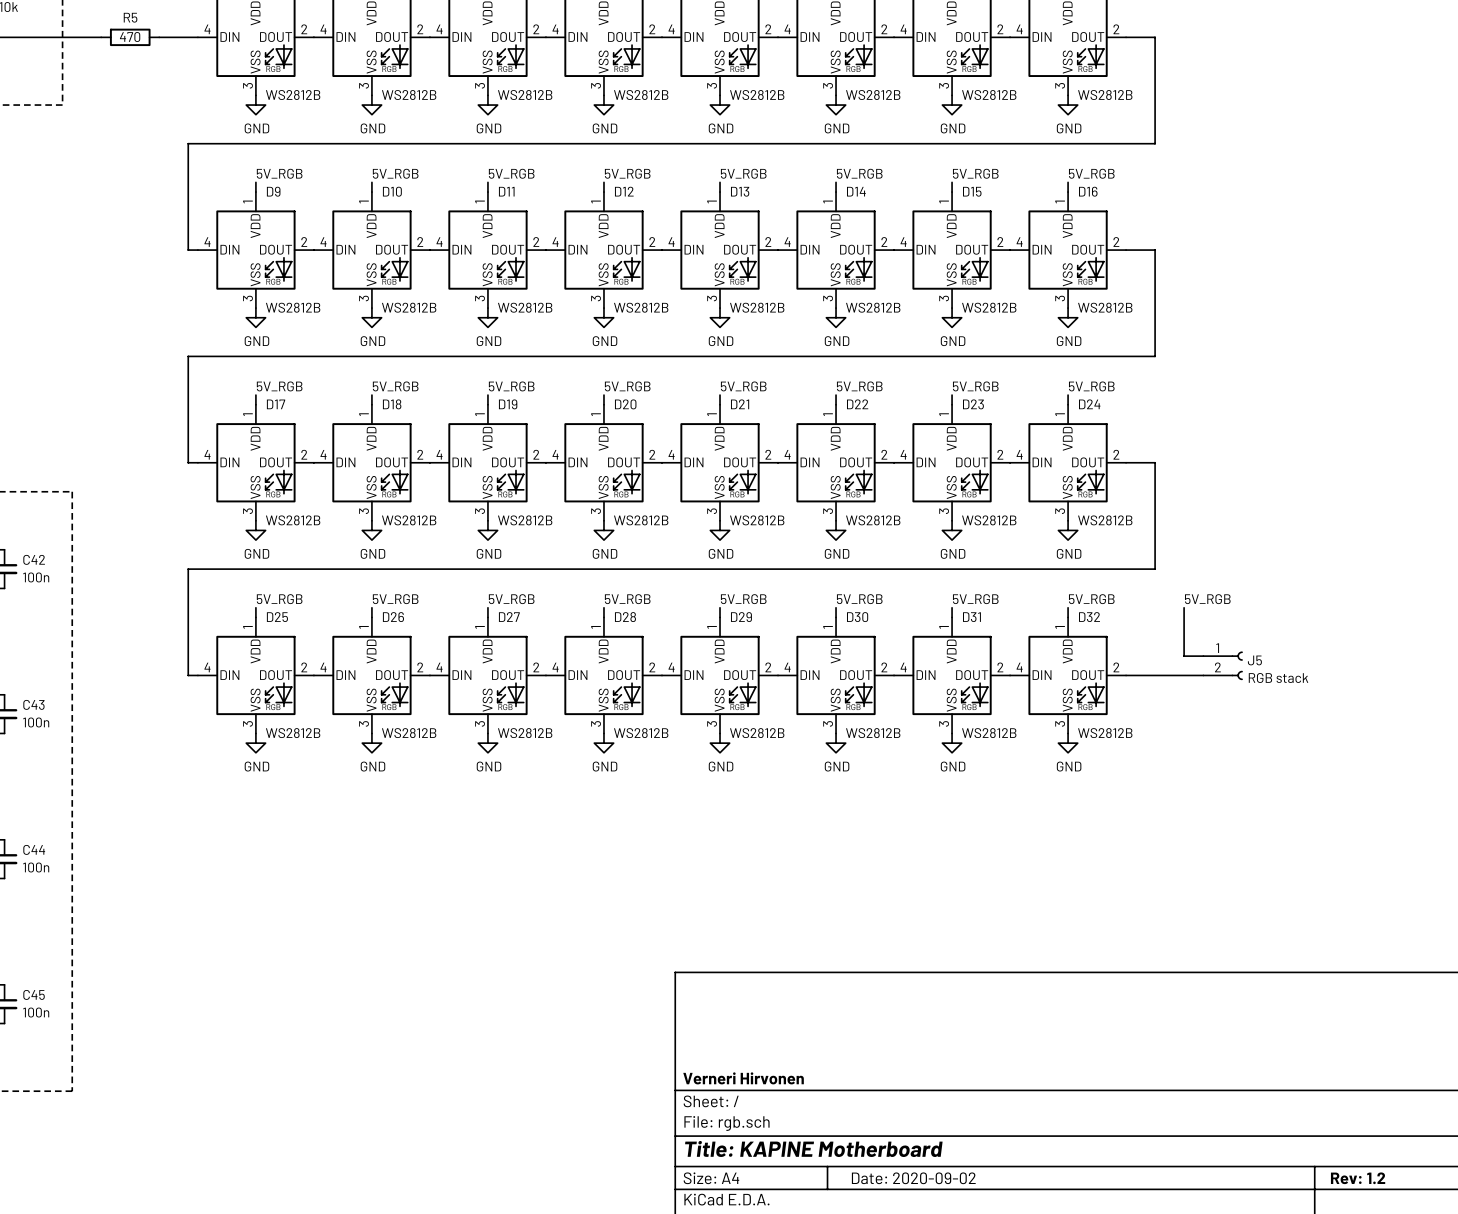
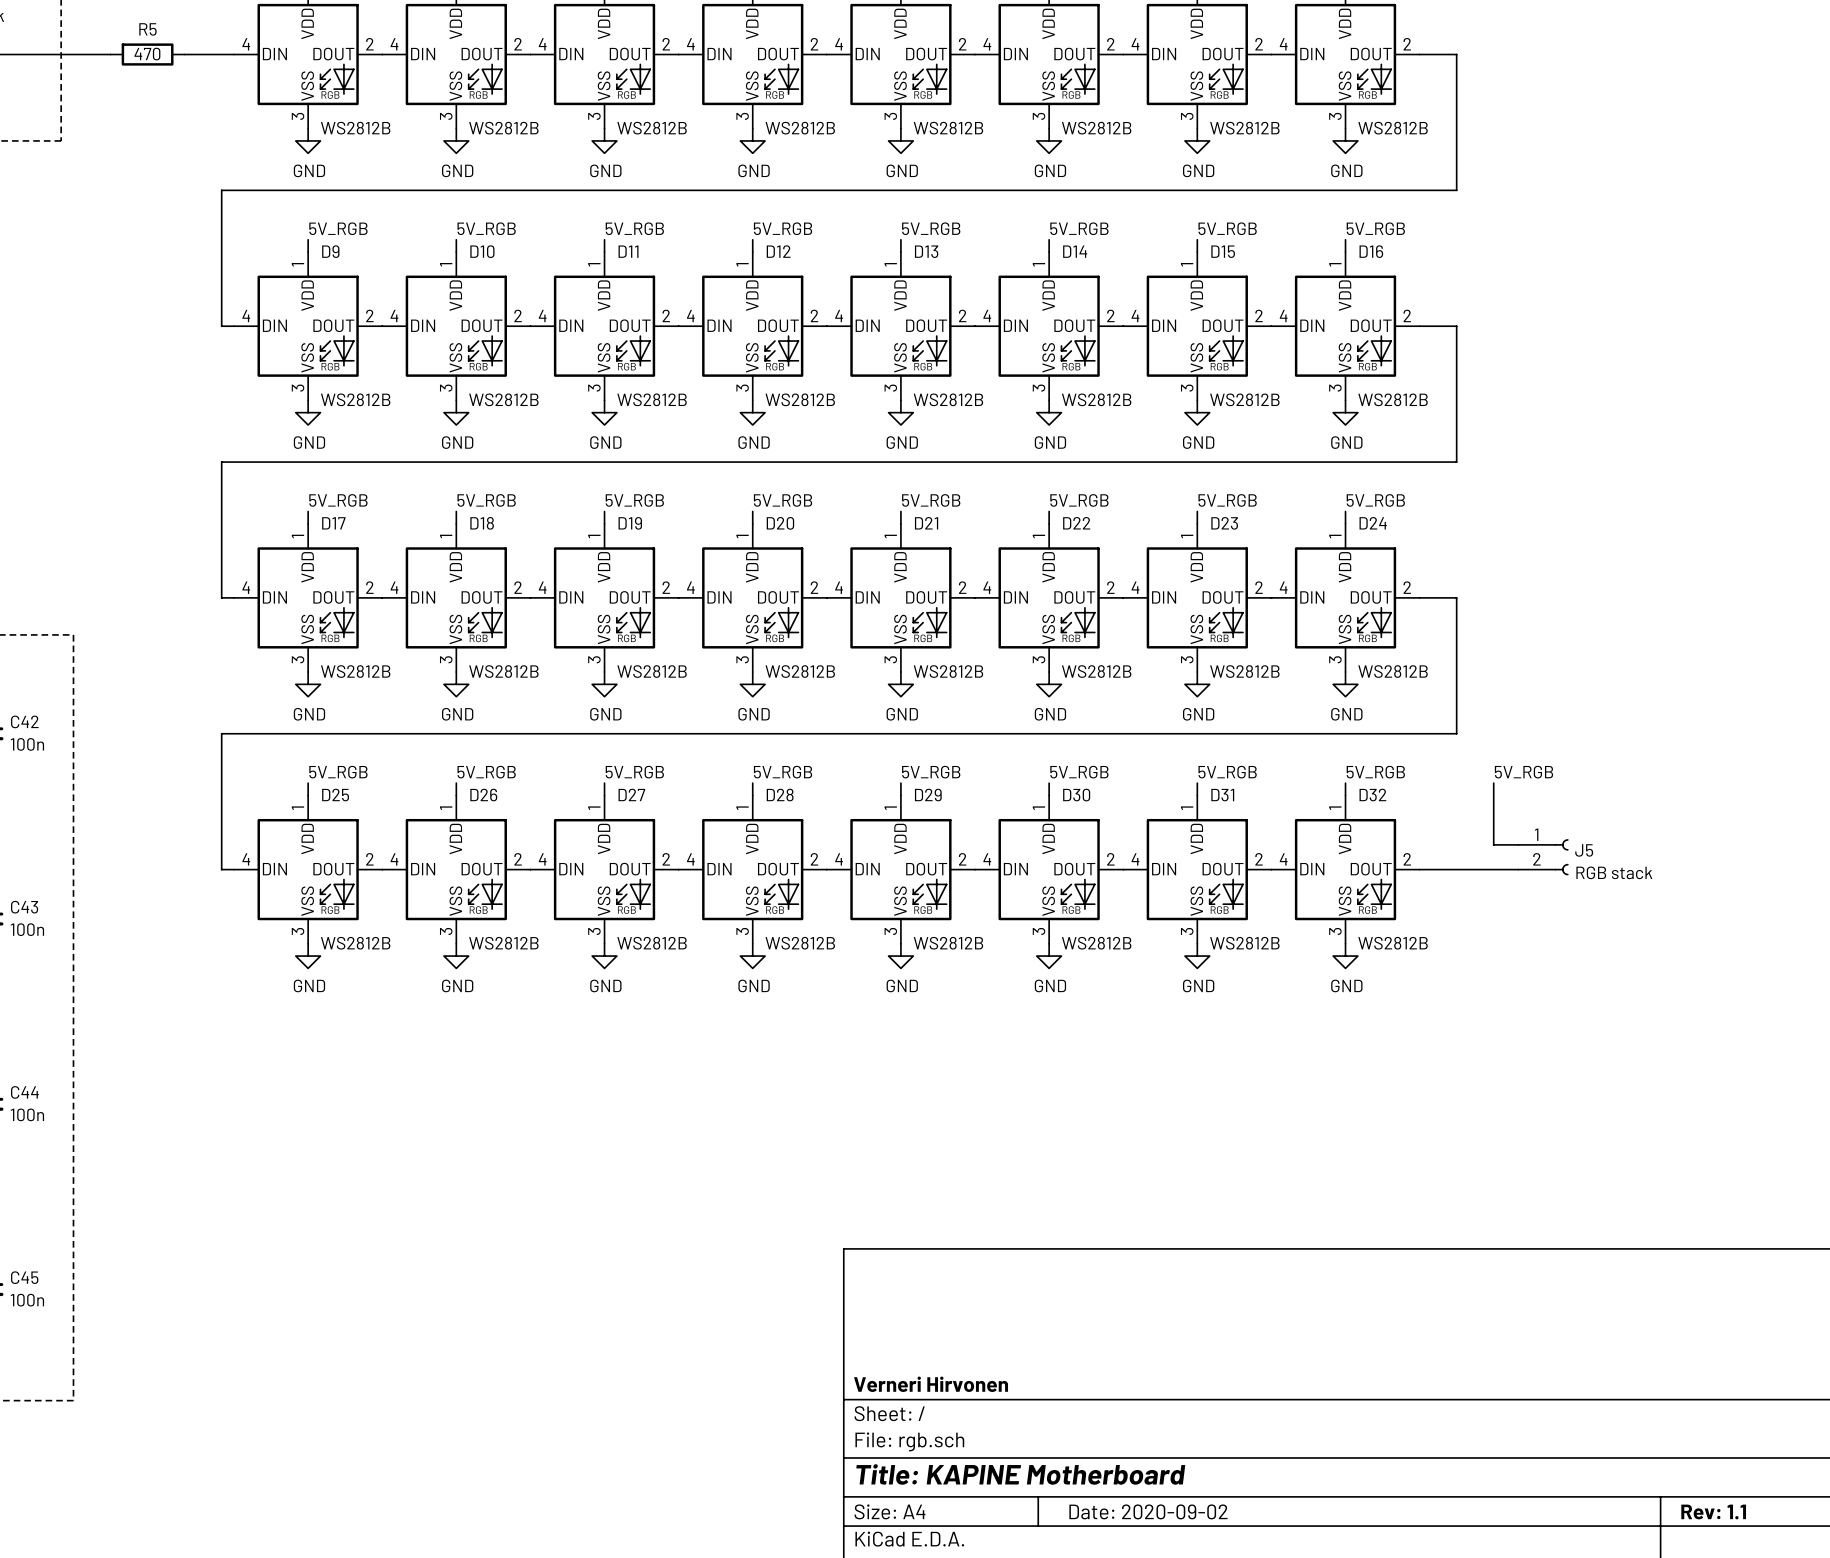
title block: Rev: 1.2 (1358, 1178) -> Rev: 1.1 (1713, 1511)

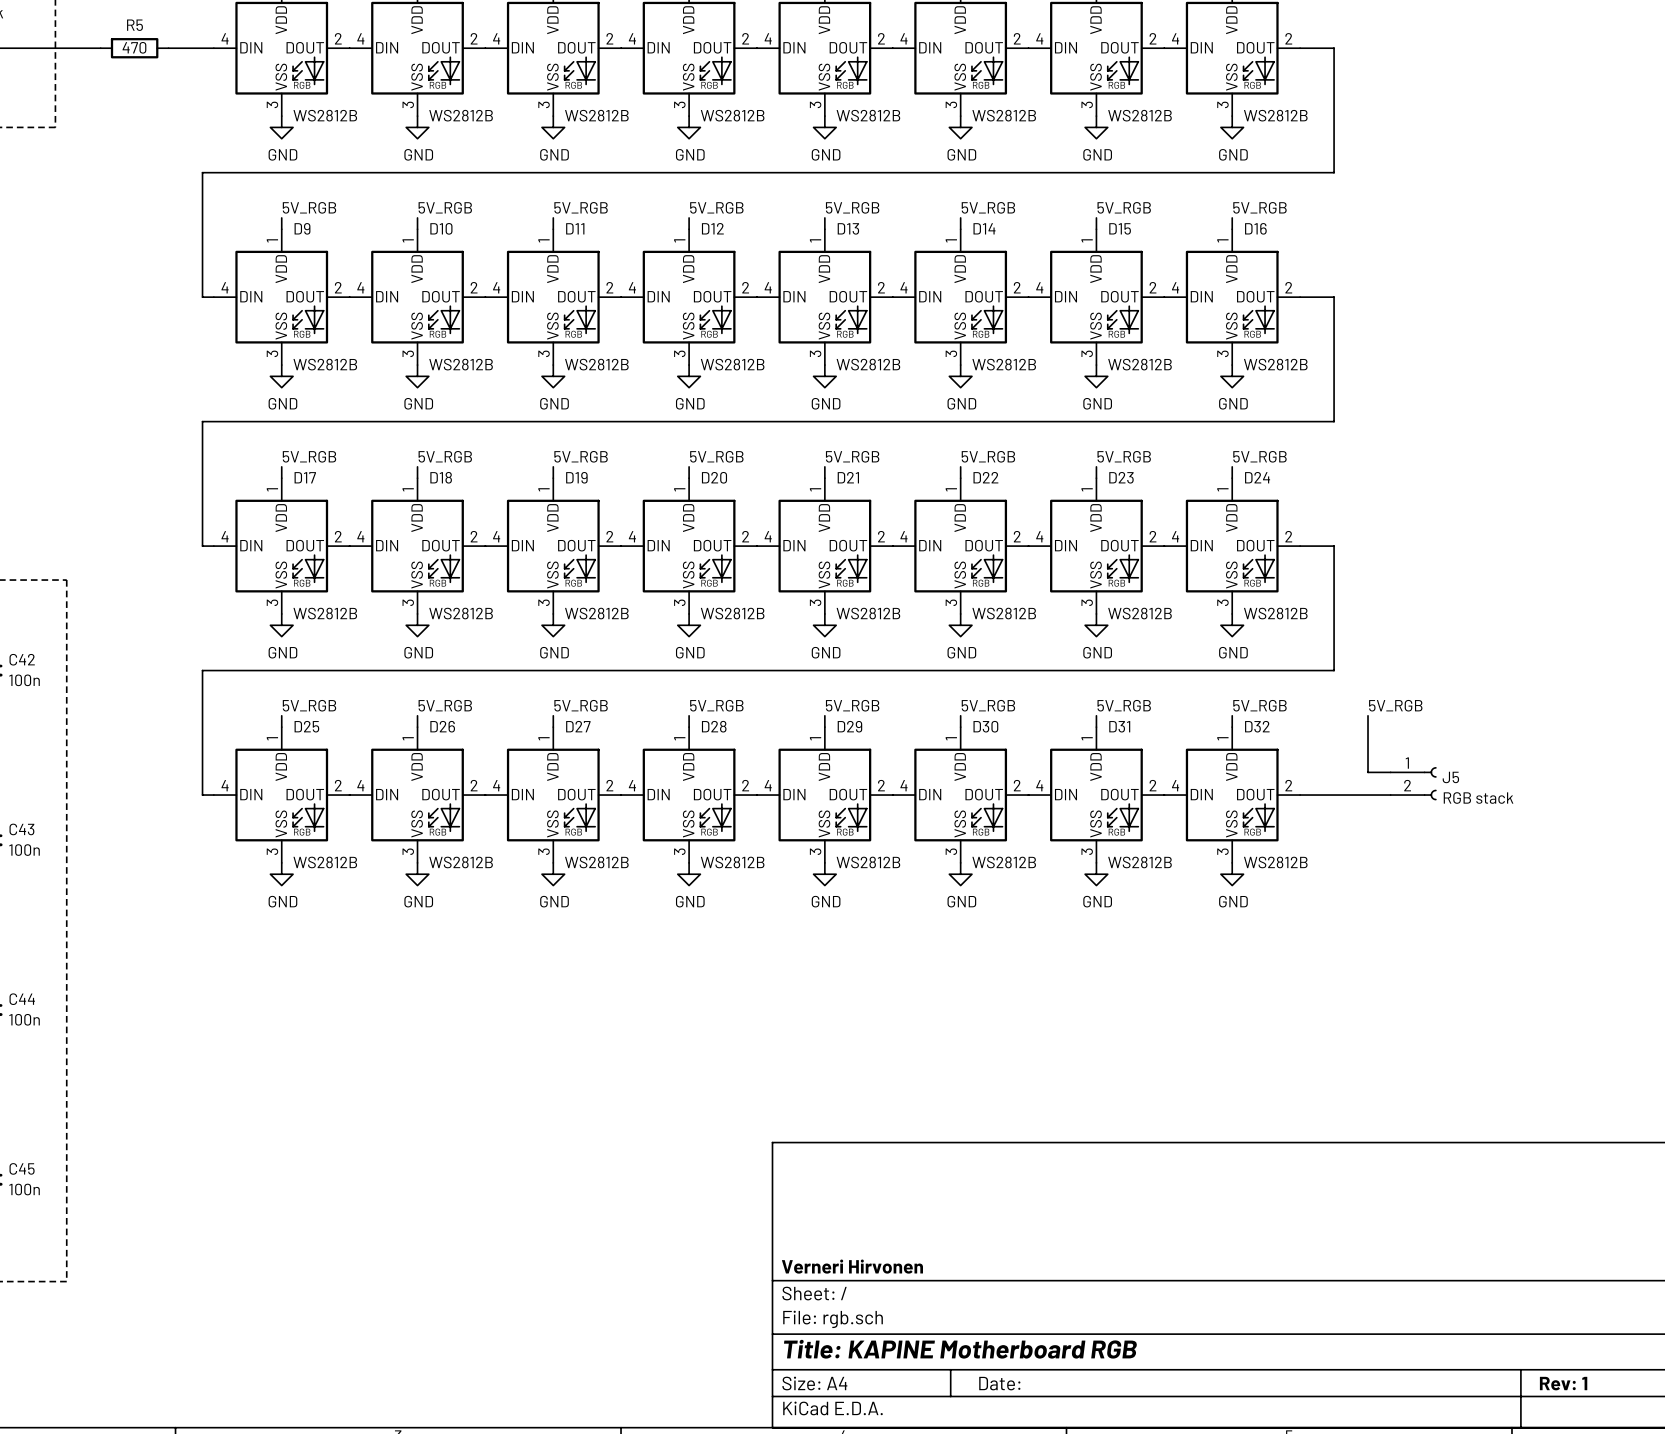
title block: Title: KAPINE Motherboard (1020, 1474) -> Title: KAPINE Motherboard RGB (960, 1349)
title block: Date: 2020-09-02 (1148, 1511) -> Date: (999, 1383)
title block: Rev: 1.1 (1713, 1511) -> Rev: 1 (1563, 1383)

